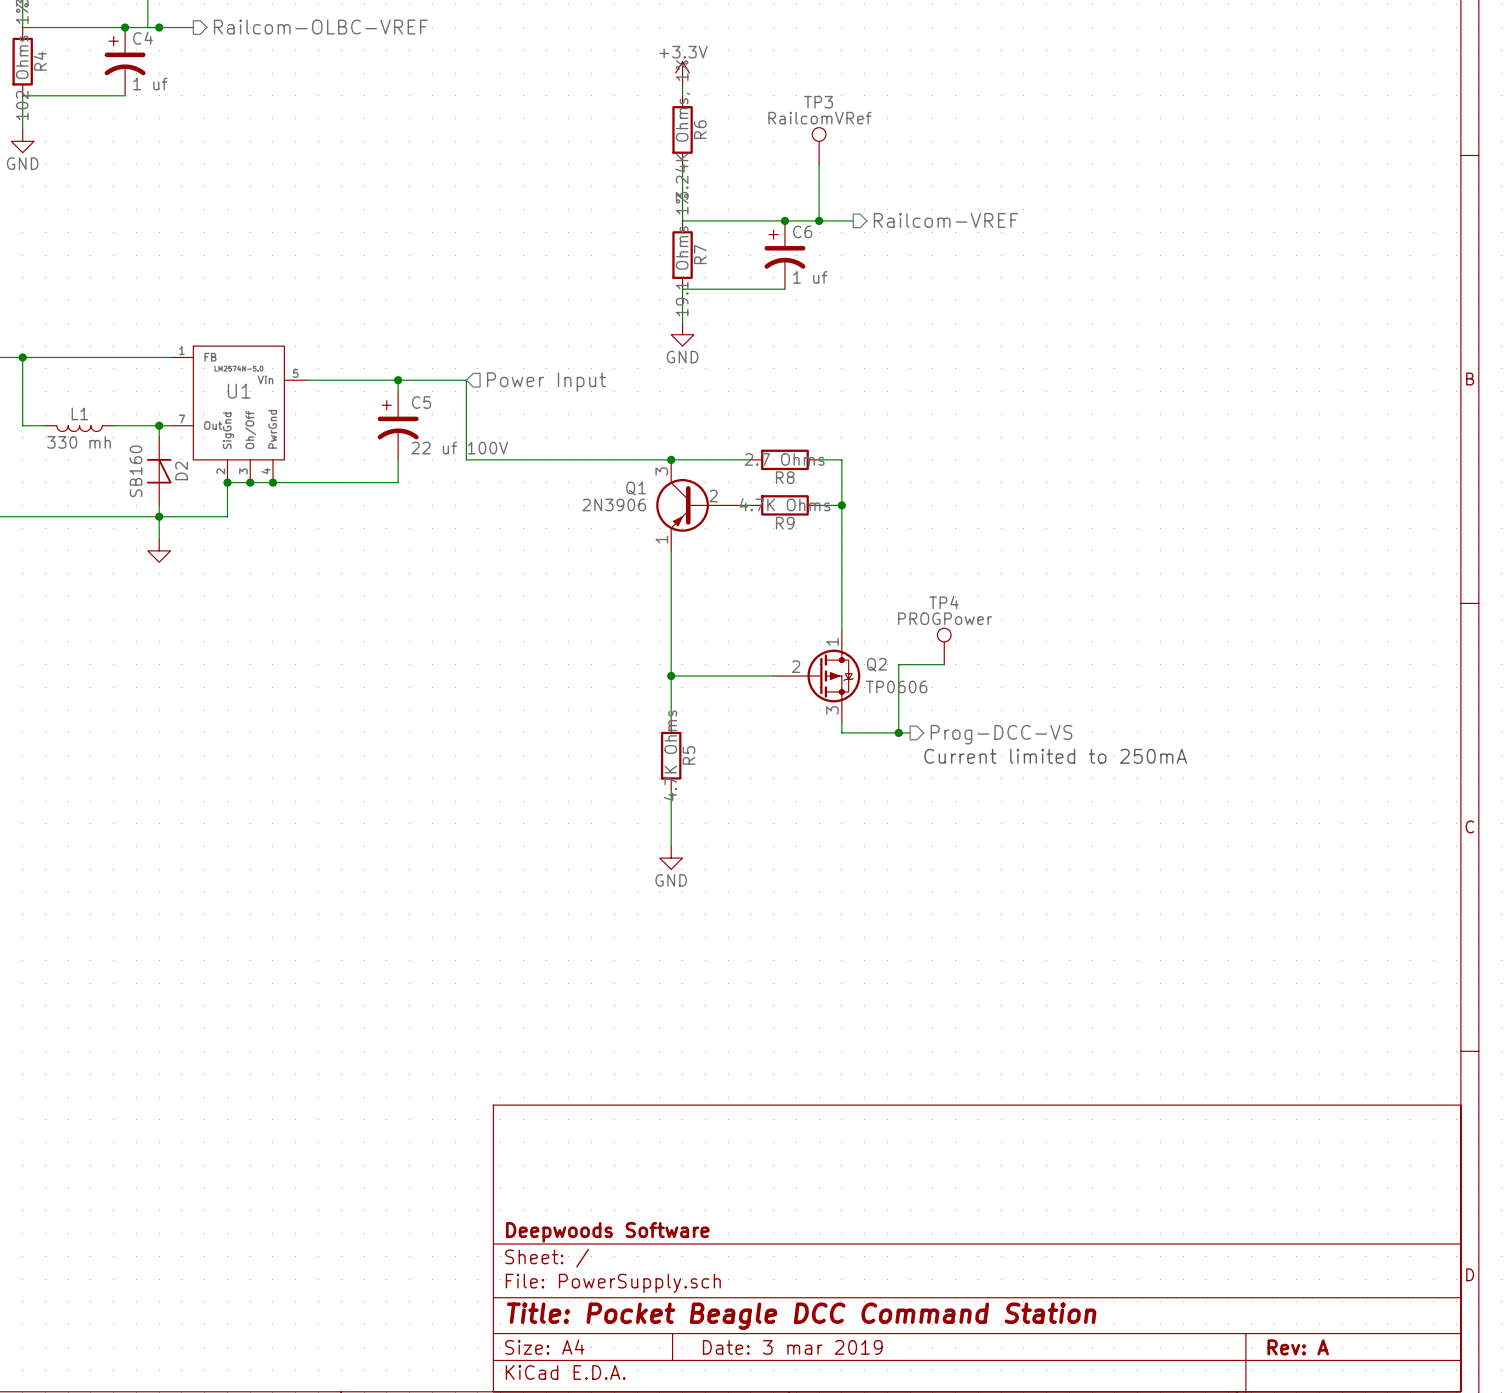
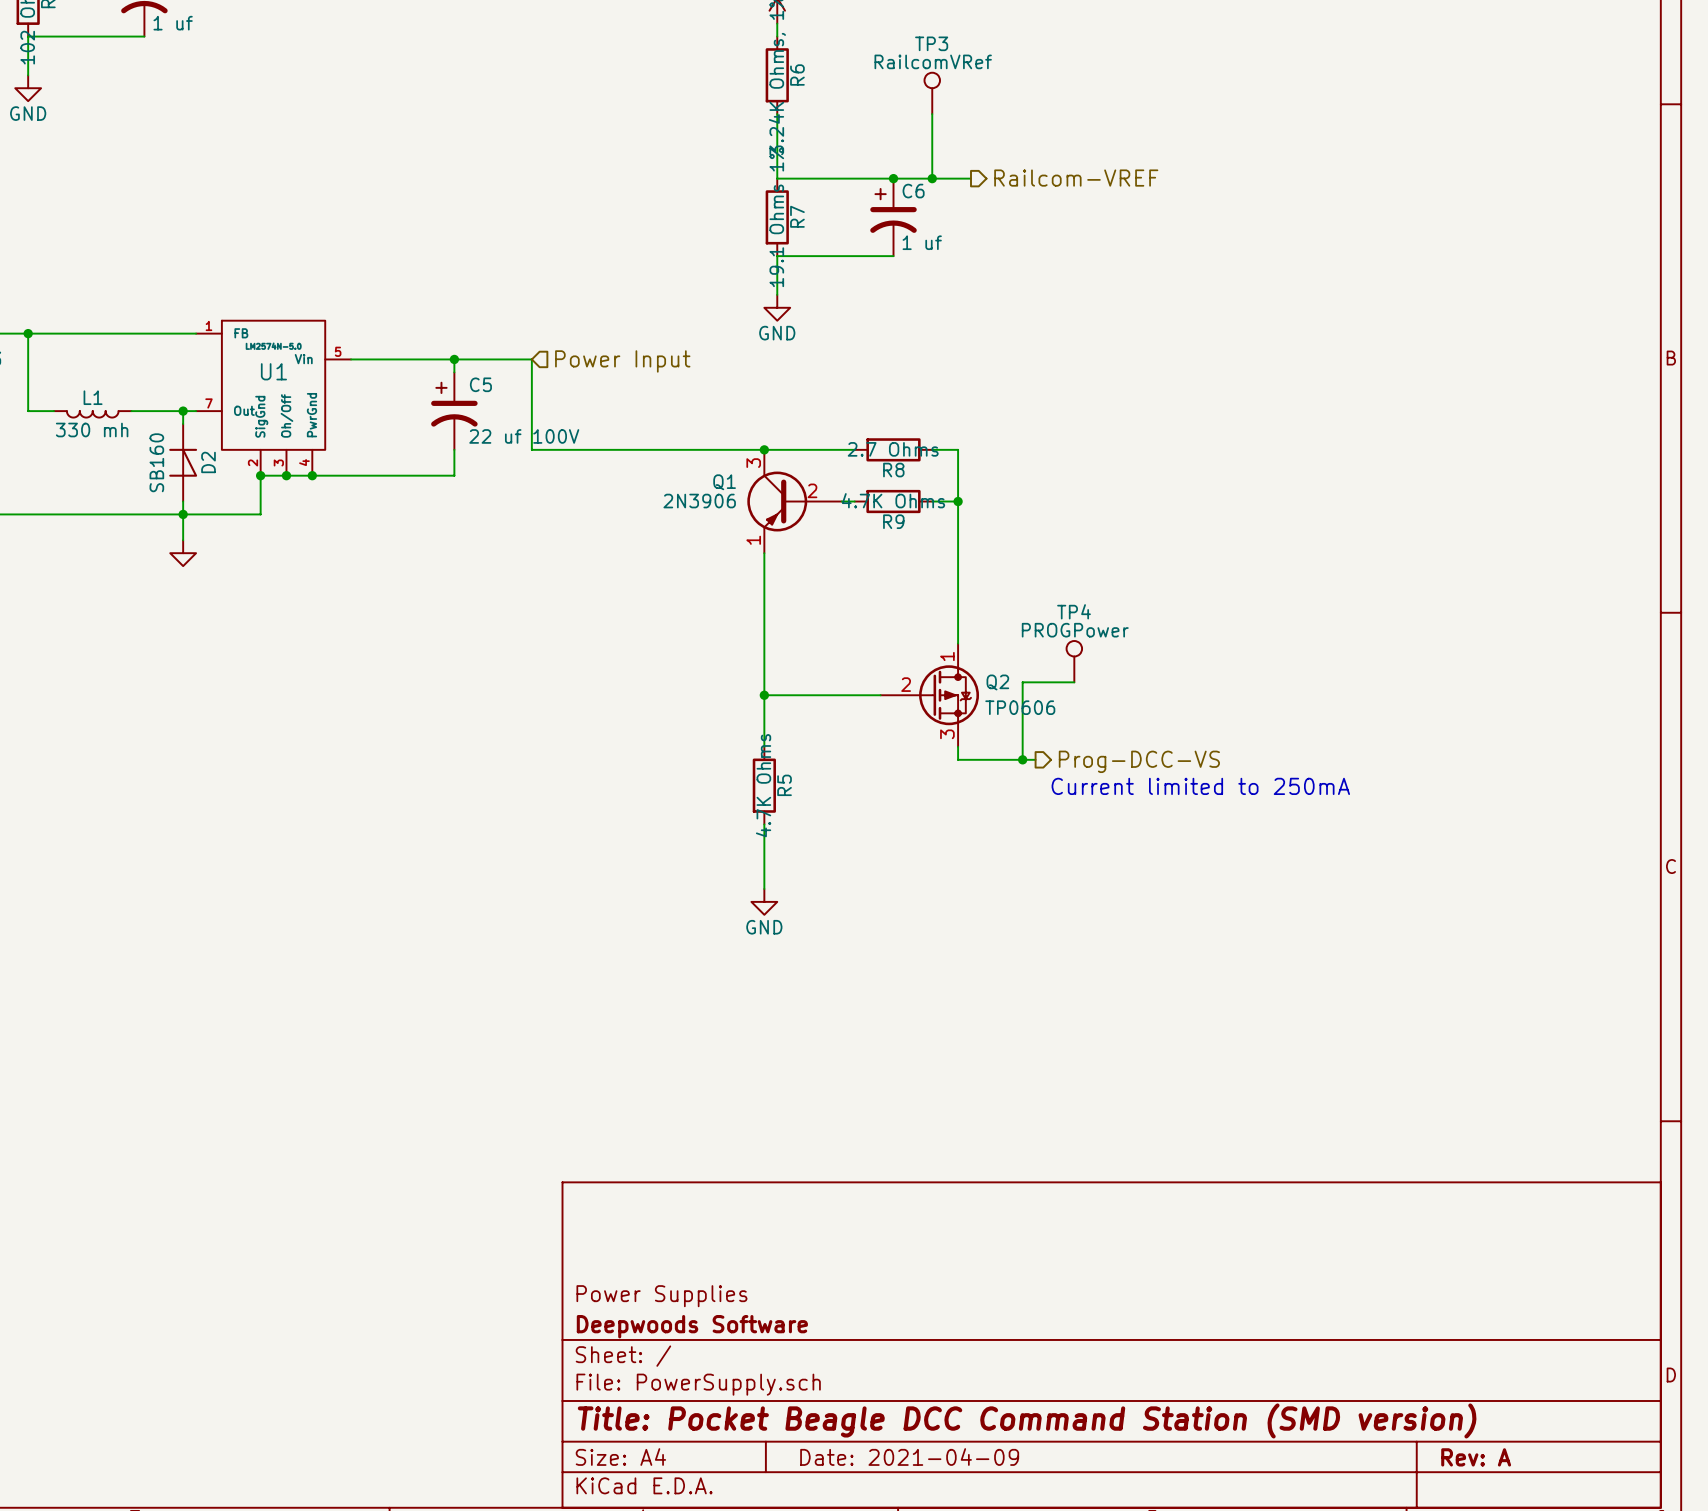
title block: none -> Power Supplies (661, 1296)
title block: Title: Pocket Beagle DCC Command Station (801, 1316) -> Title: Pocket Beagle DCC Command Station (SMD version) (1027, 1420)
title block: Date: 3 mar 2019 (792, 1347) -> Date: 2021-04-09 (909, 1457)

